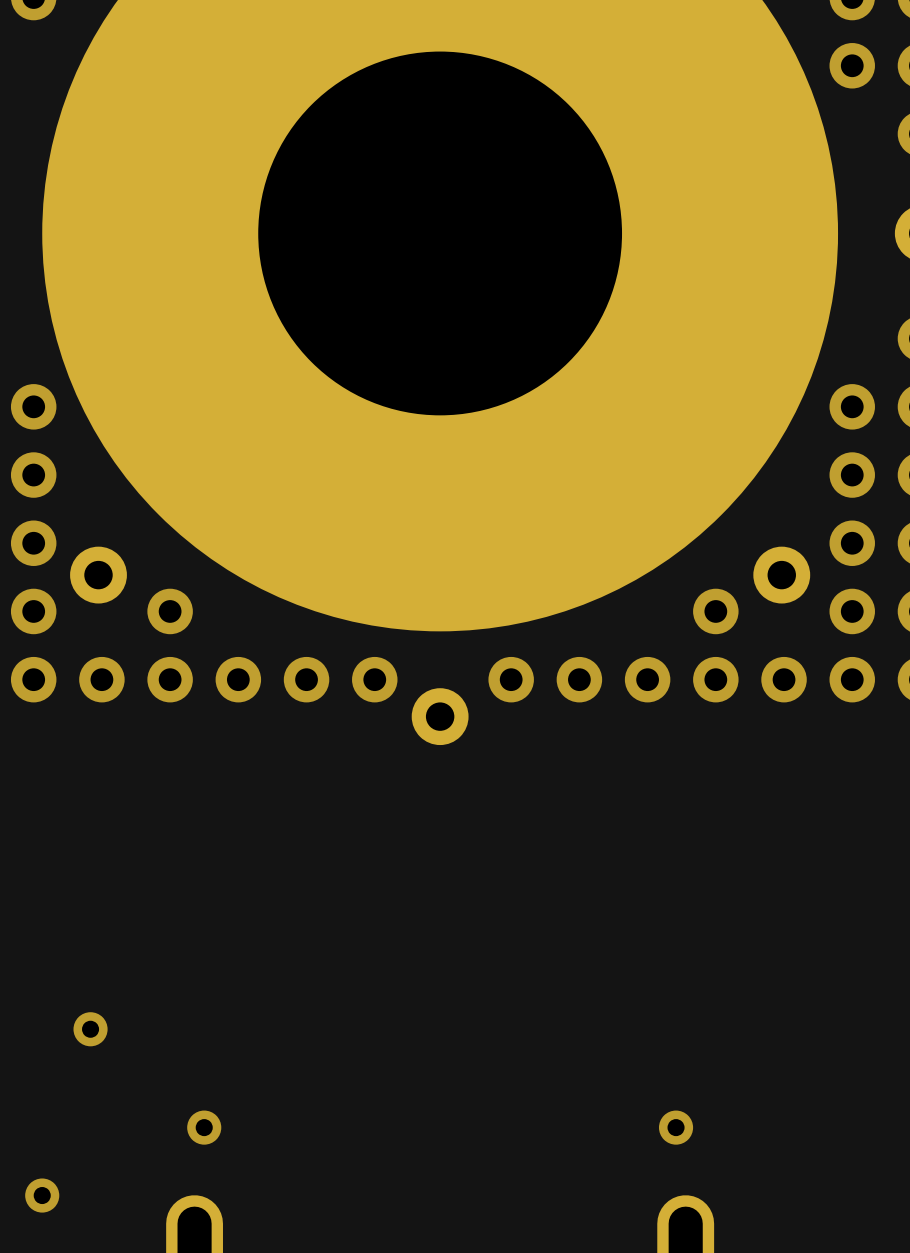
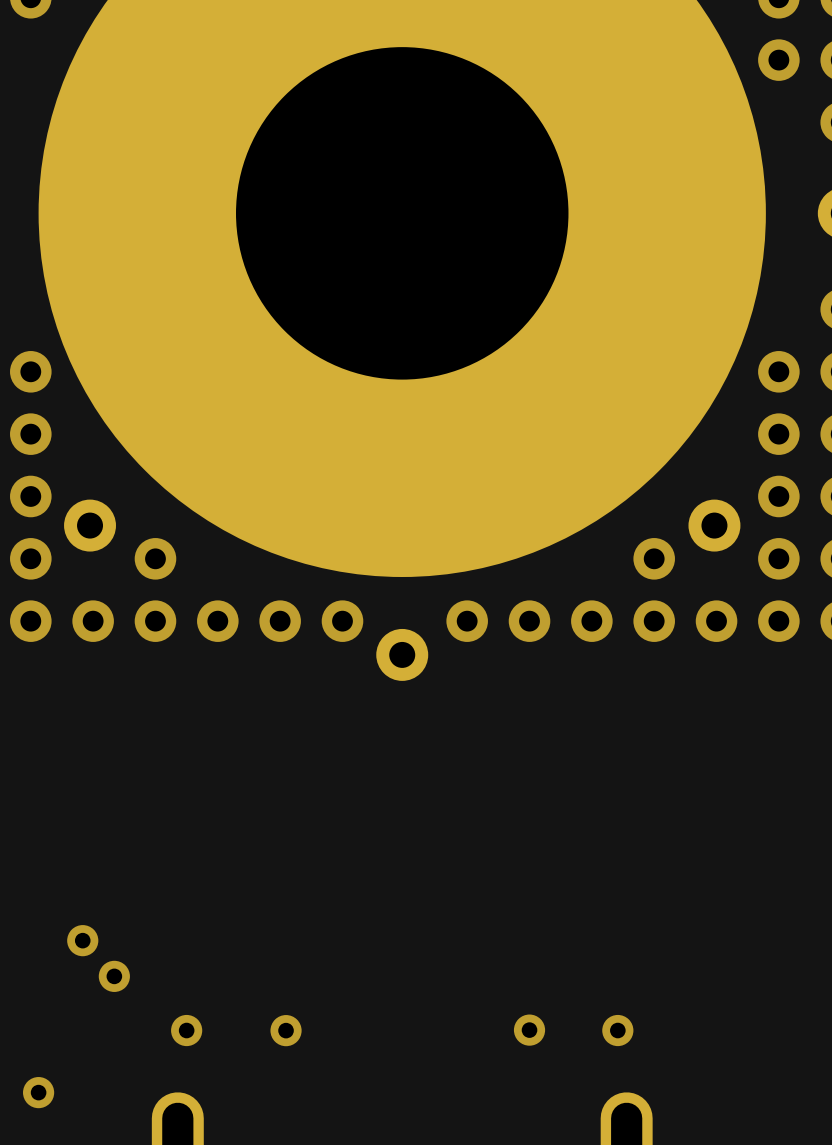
via: none -> (114, 976)
via: none -> (286, 1030)
via: none -> (529, 1030)

